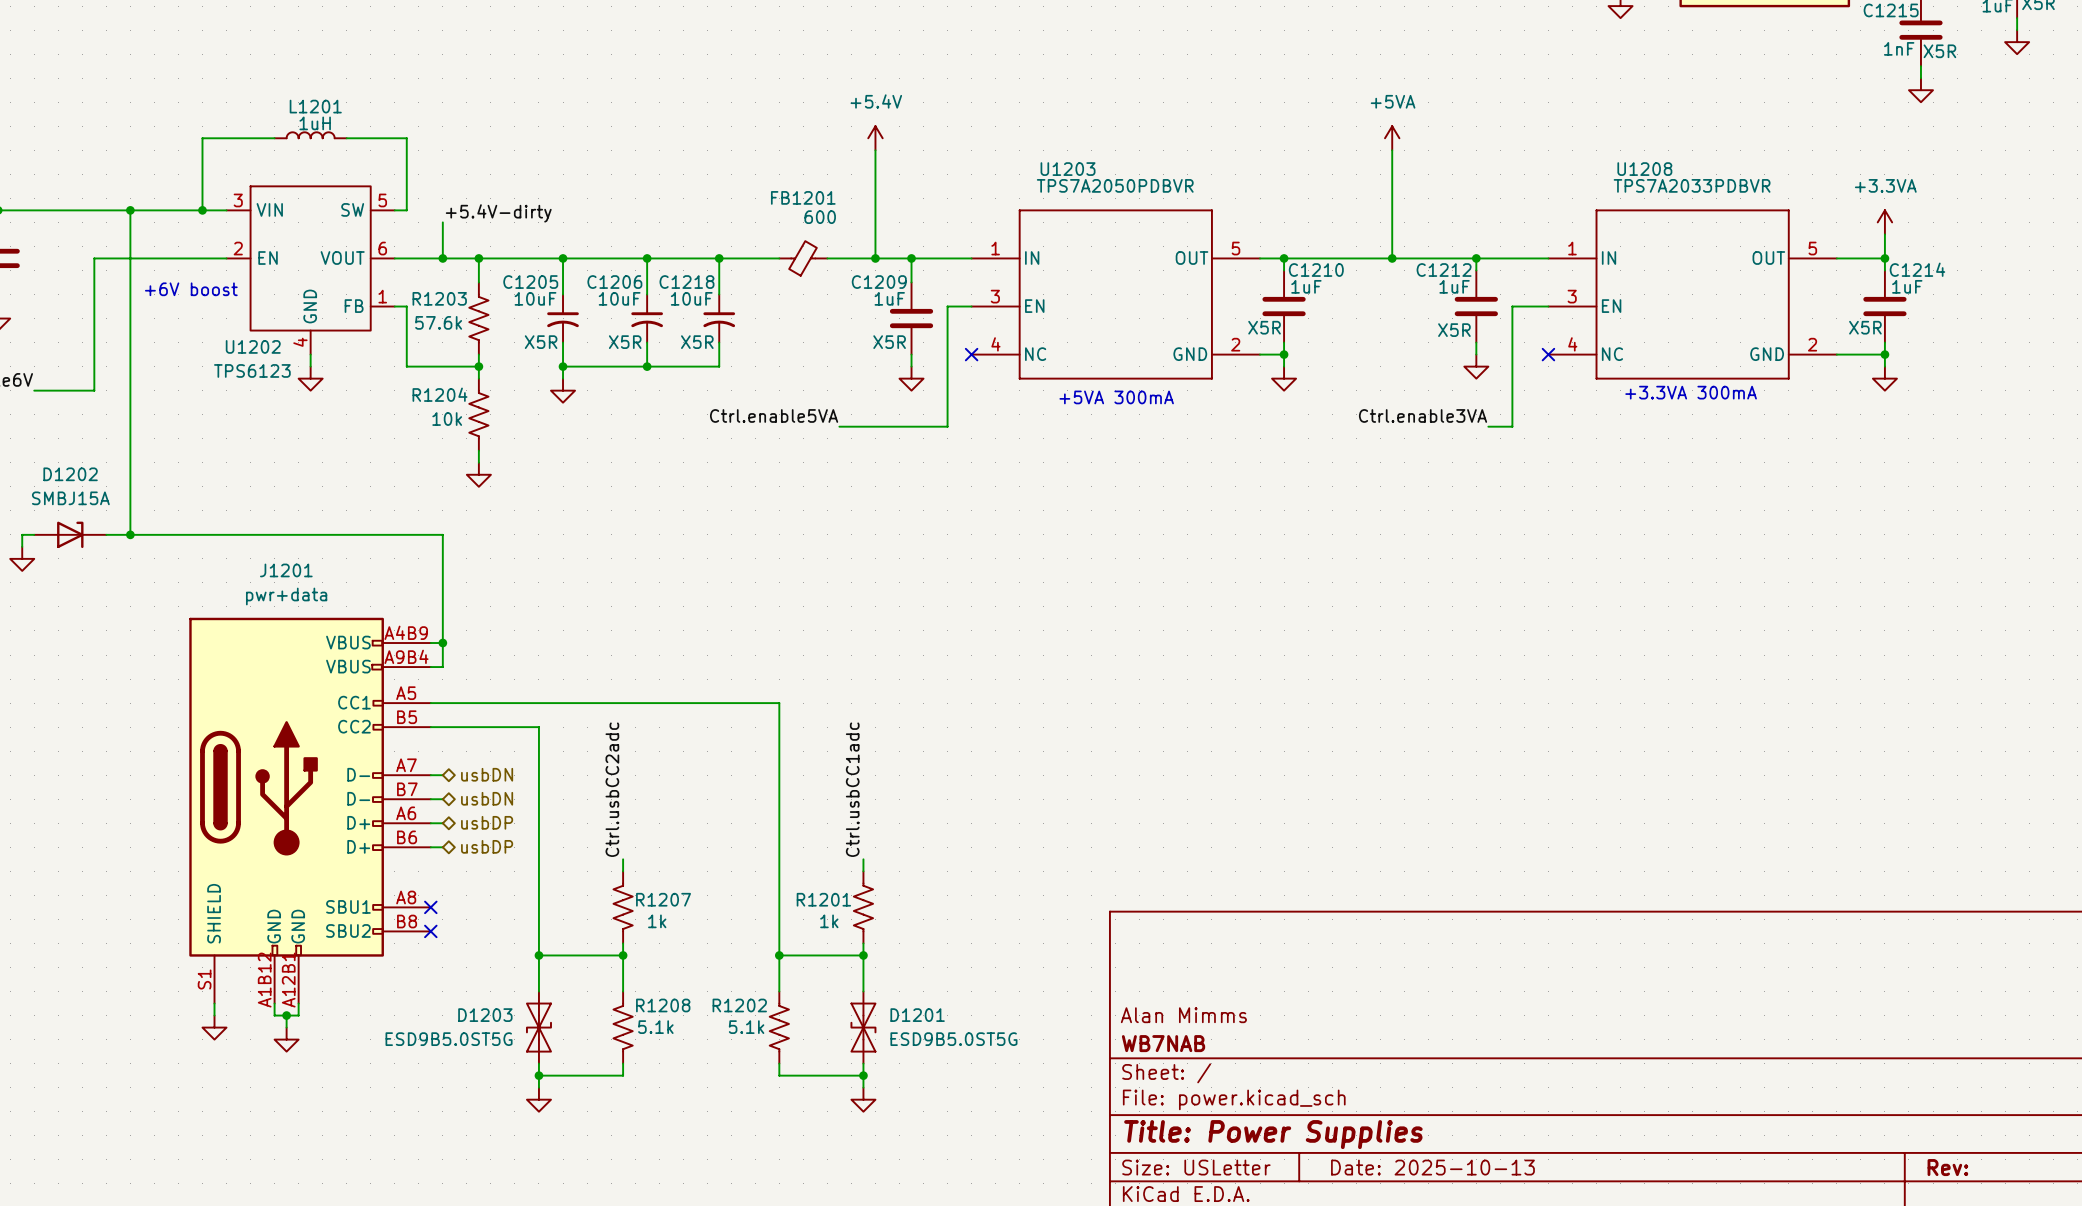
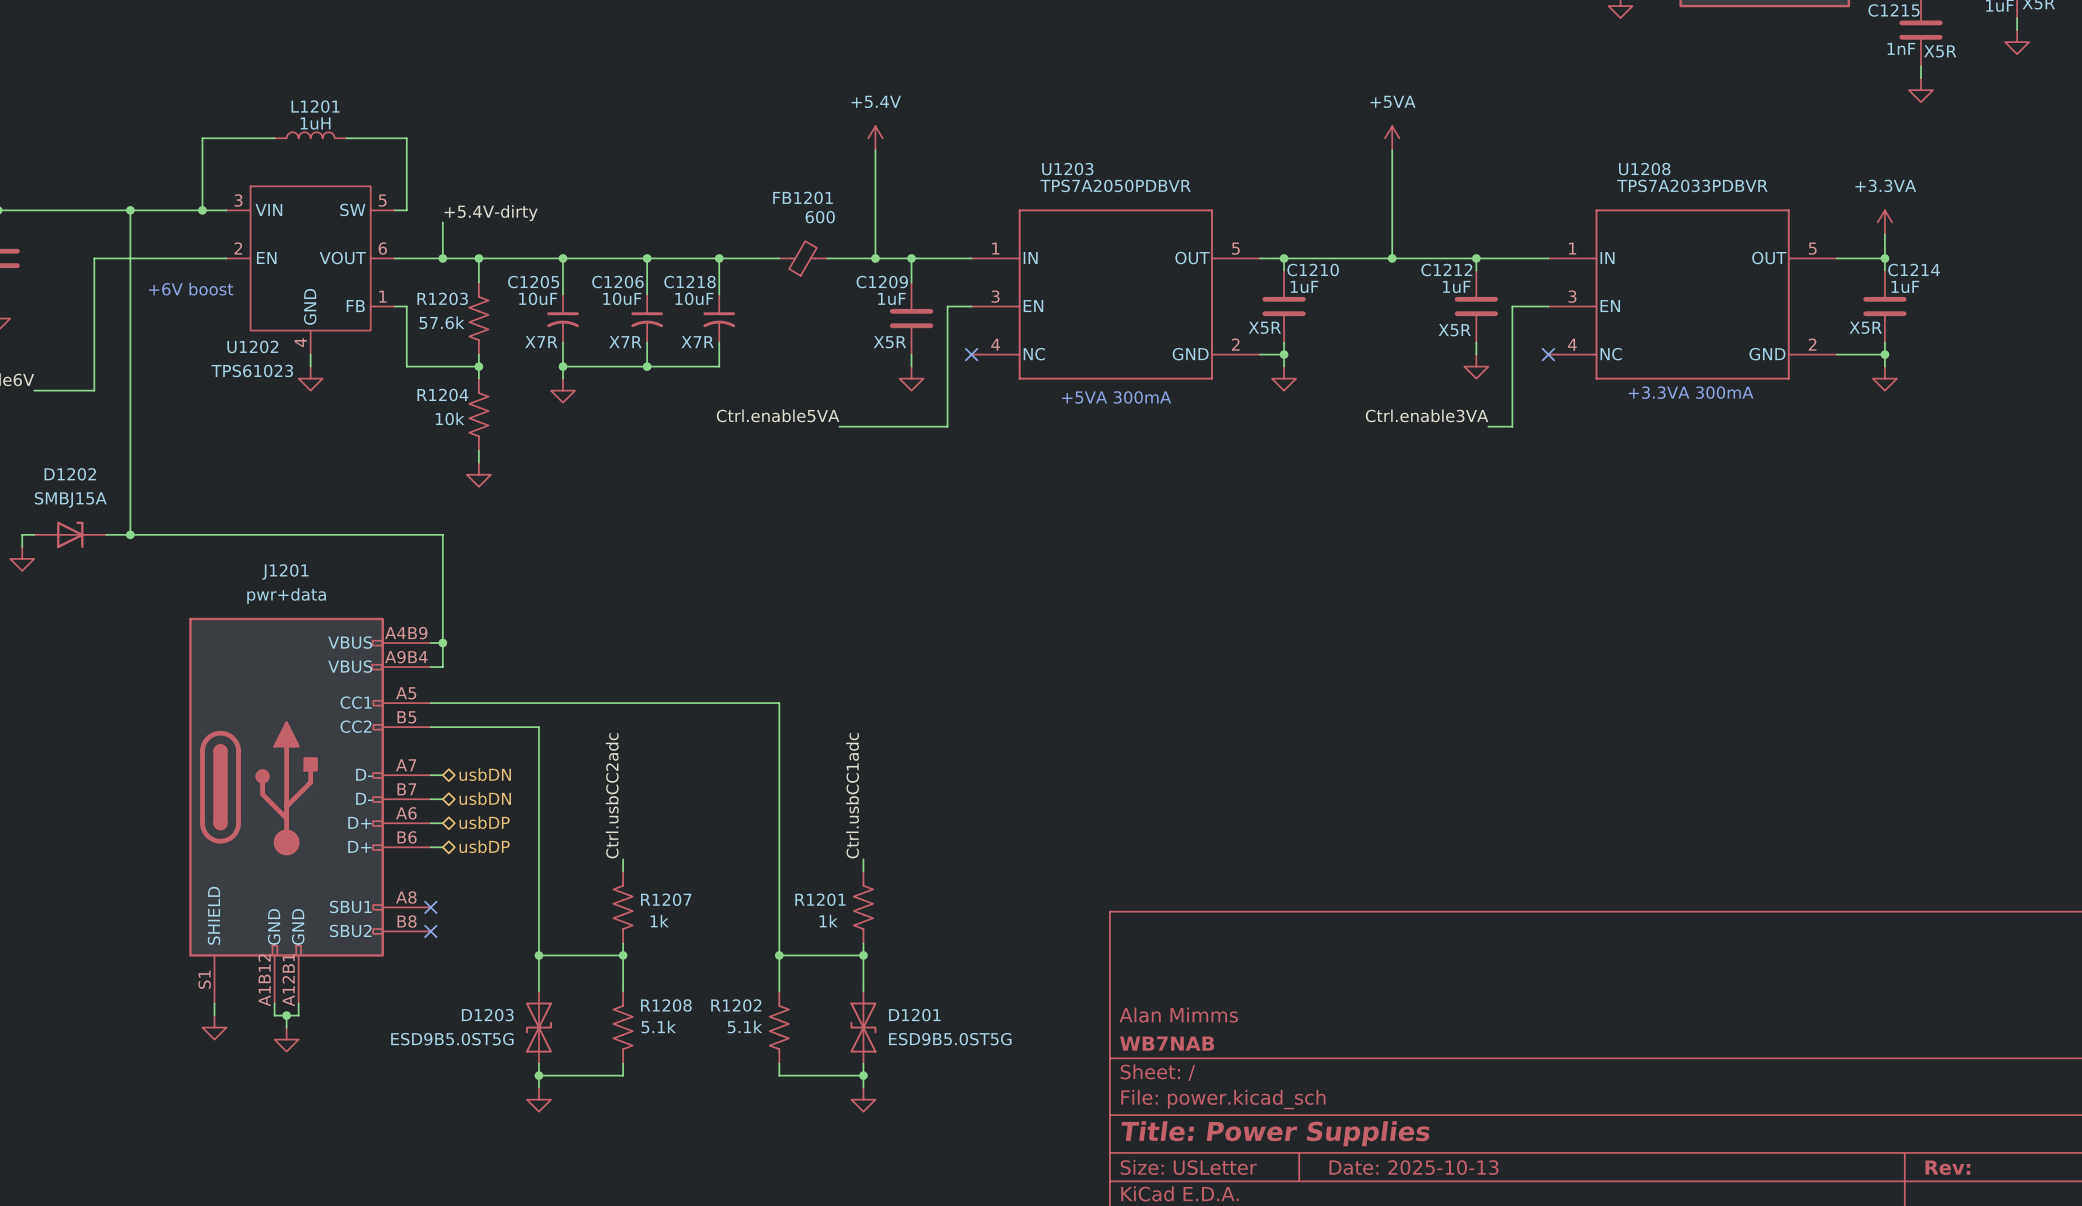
C1205 text: X5R (541, 342) -> X7R (541, 342)
C1206 text: X5R (625, 342) -> X7R (625, 342)
C1218 text: X5R (697, 342) -> X7R (697, 342)
U1202 value: TPS6123 (252, 370) -> TPS61023 (252, 370)

